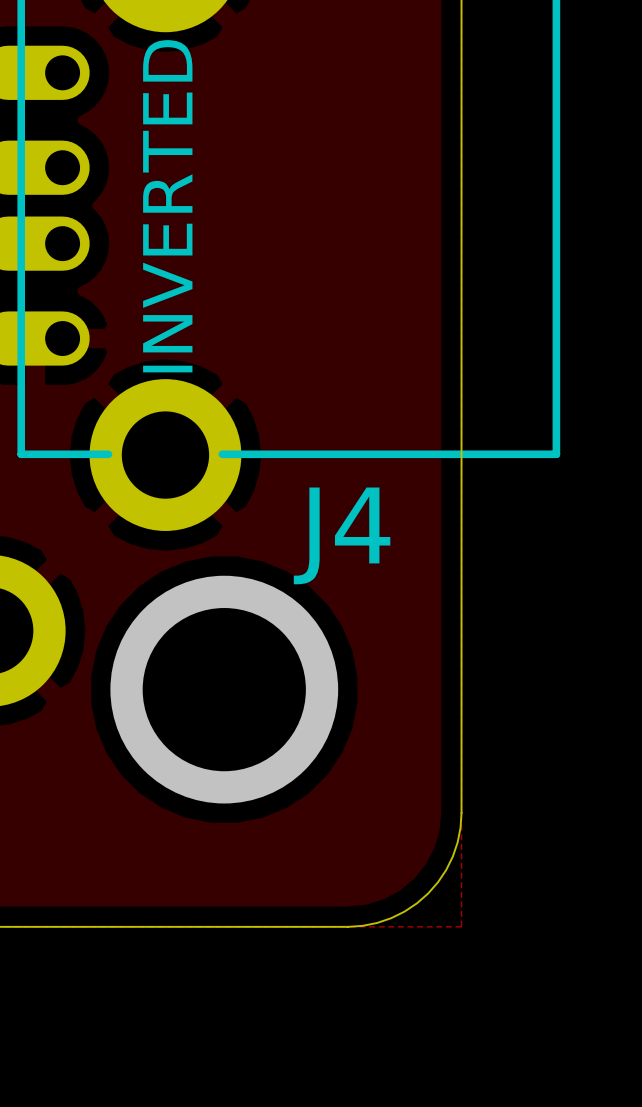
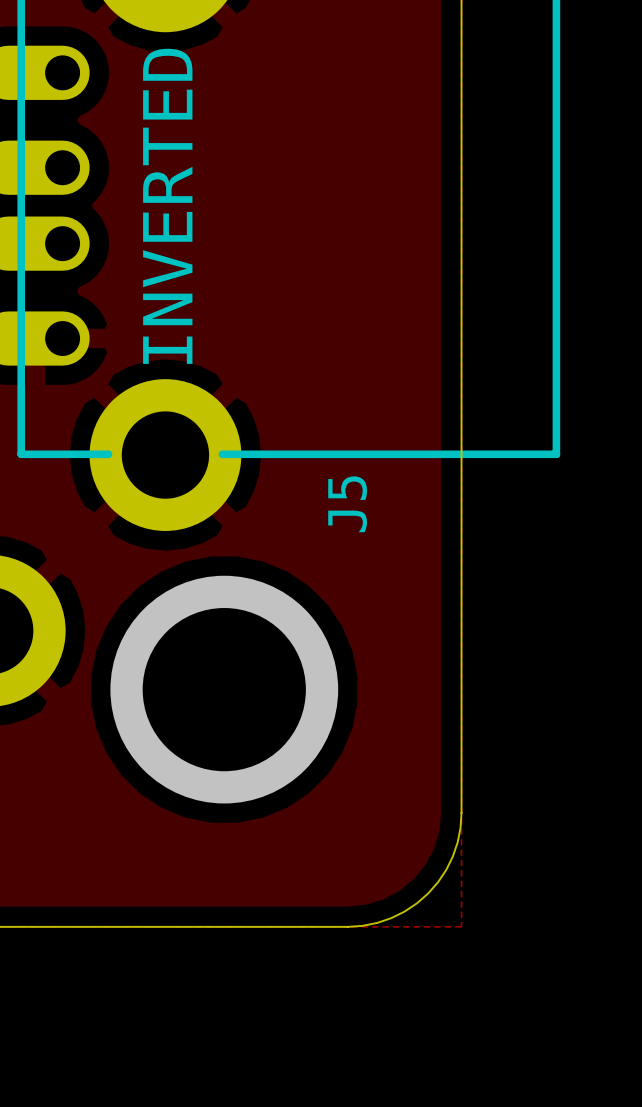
J4 name: J4 (342, 535) -> J5 (347, 504)

